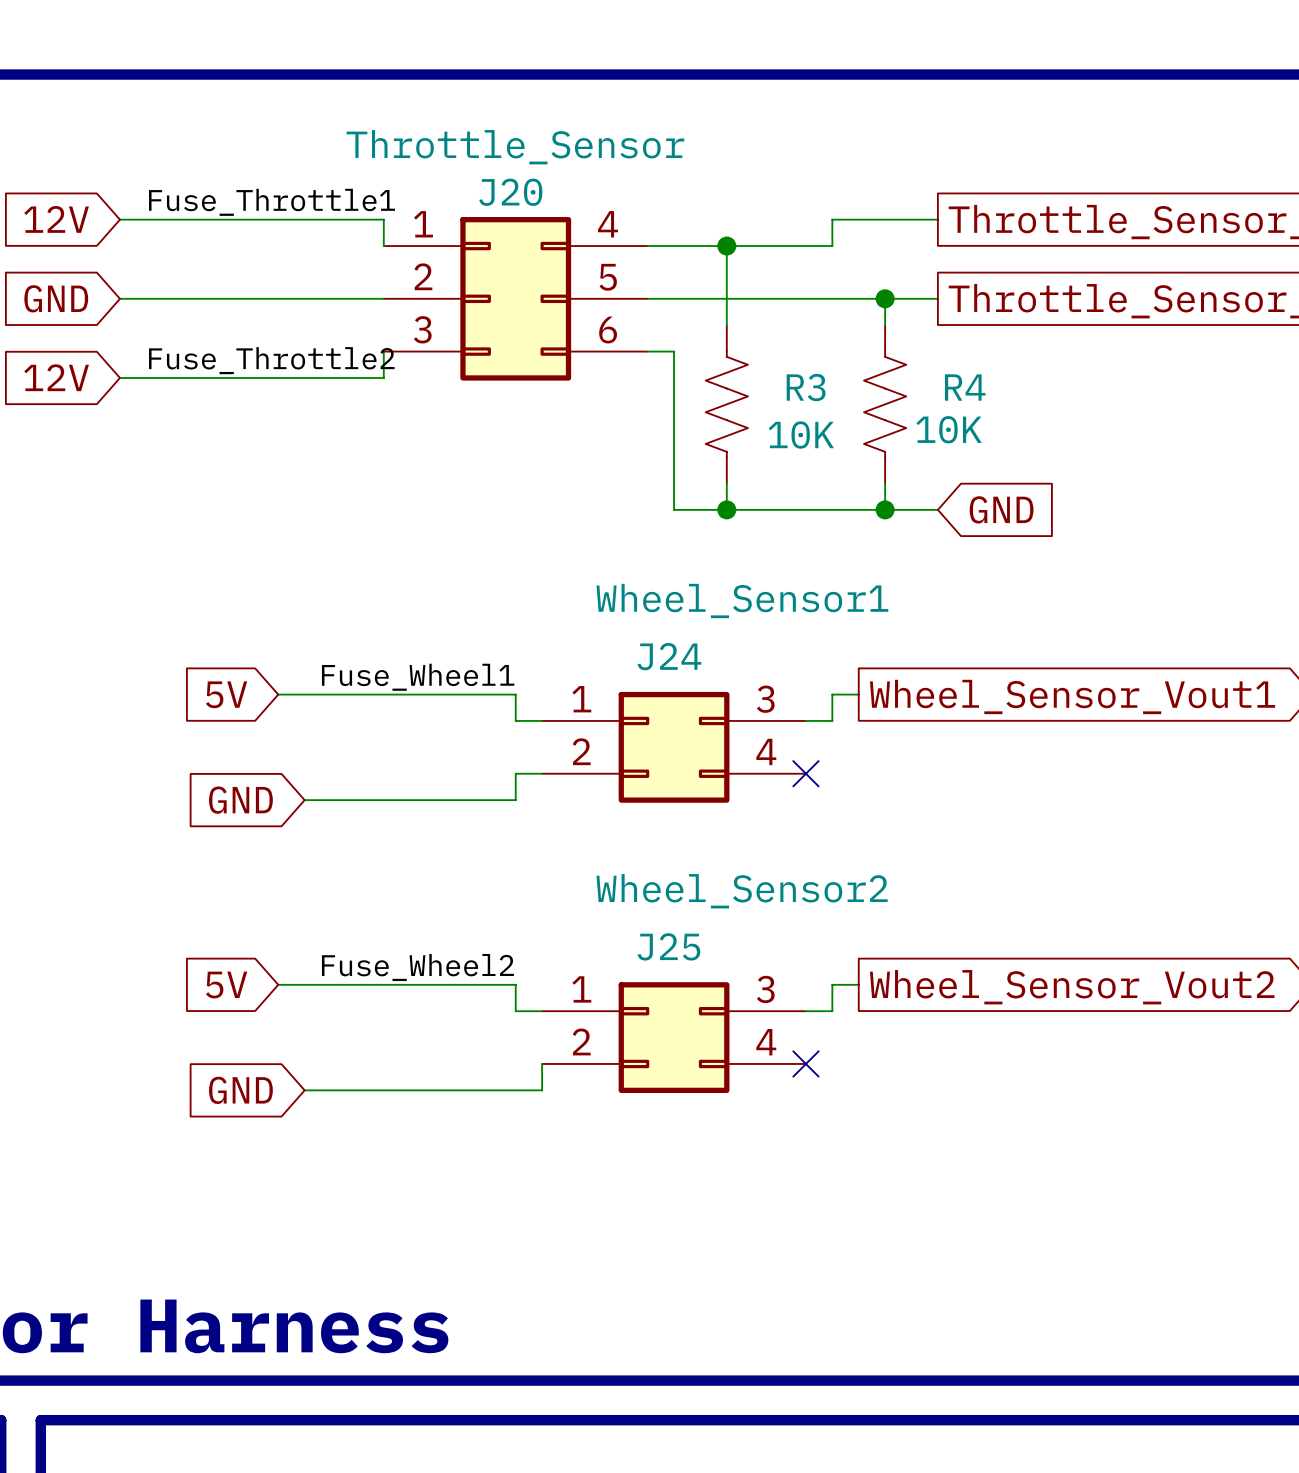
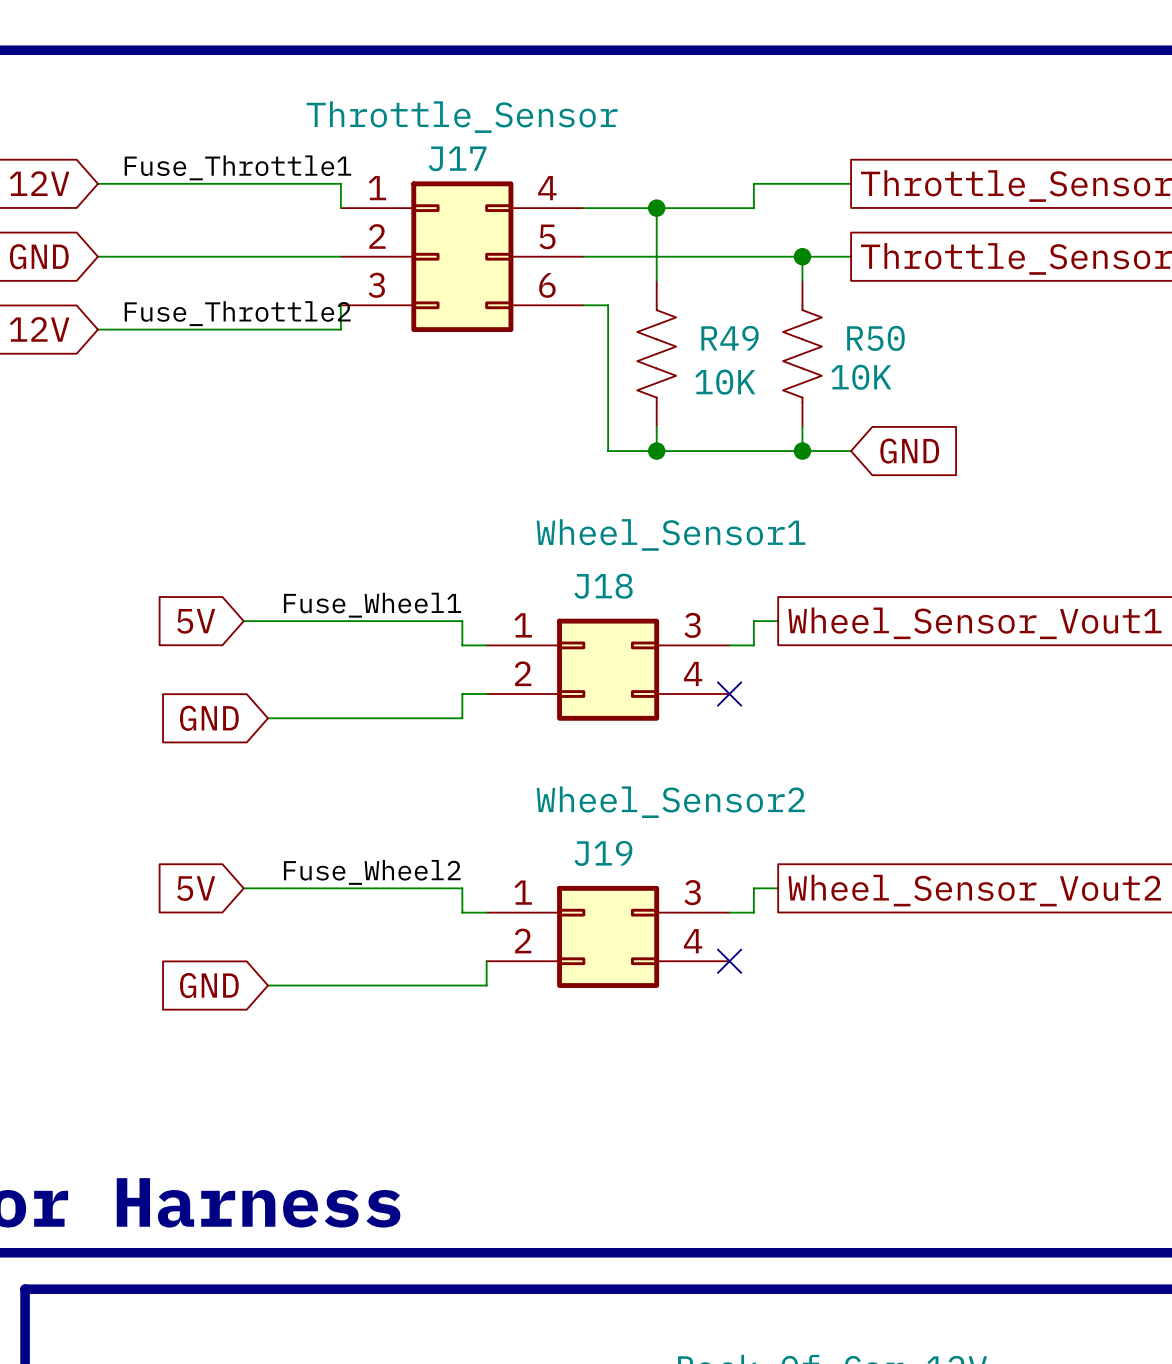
J20 name: J20 (510, 192) -> J17 (457, 158)
R3 name: R3 (806, 387) -> R49 (730, 338)
R4 name: R4 (965, 387) -> R50 (875, 338)
J24 name: J24 (669, 656) -> J18 (603, 586)
J25 name: J25 (668, 946) -> J19 (603, 853)

